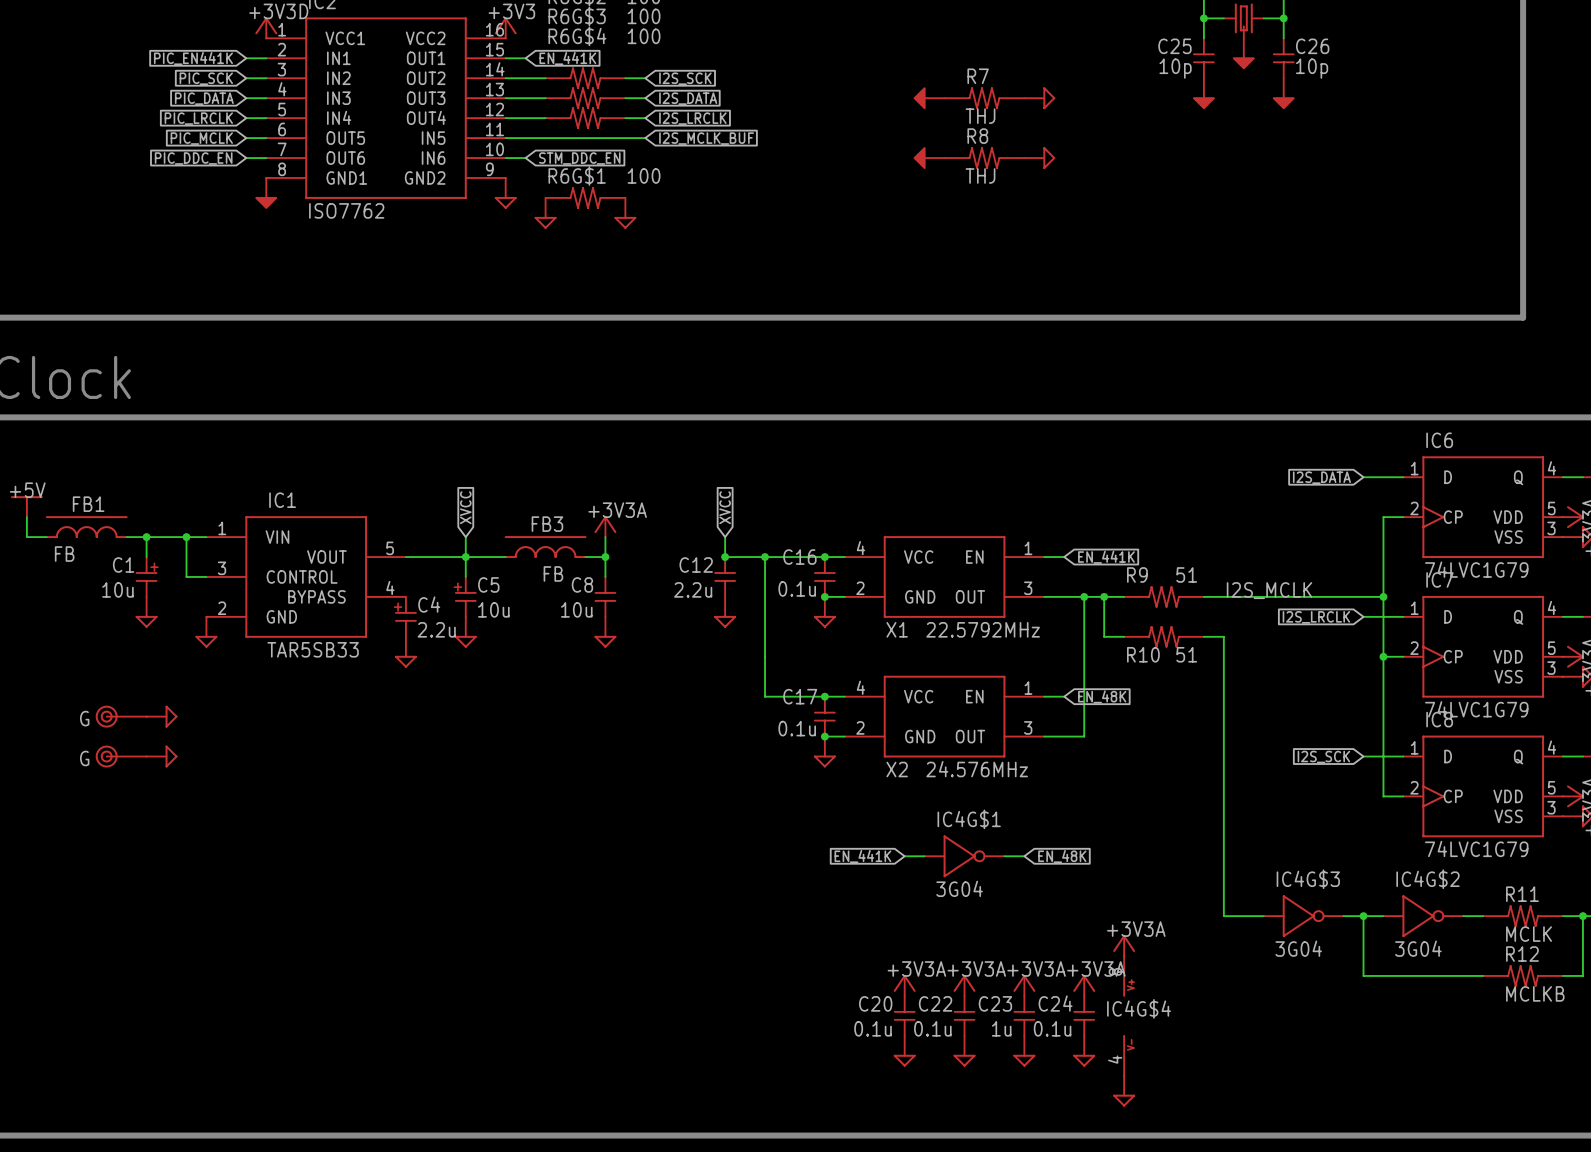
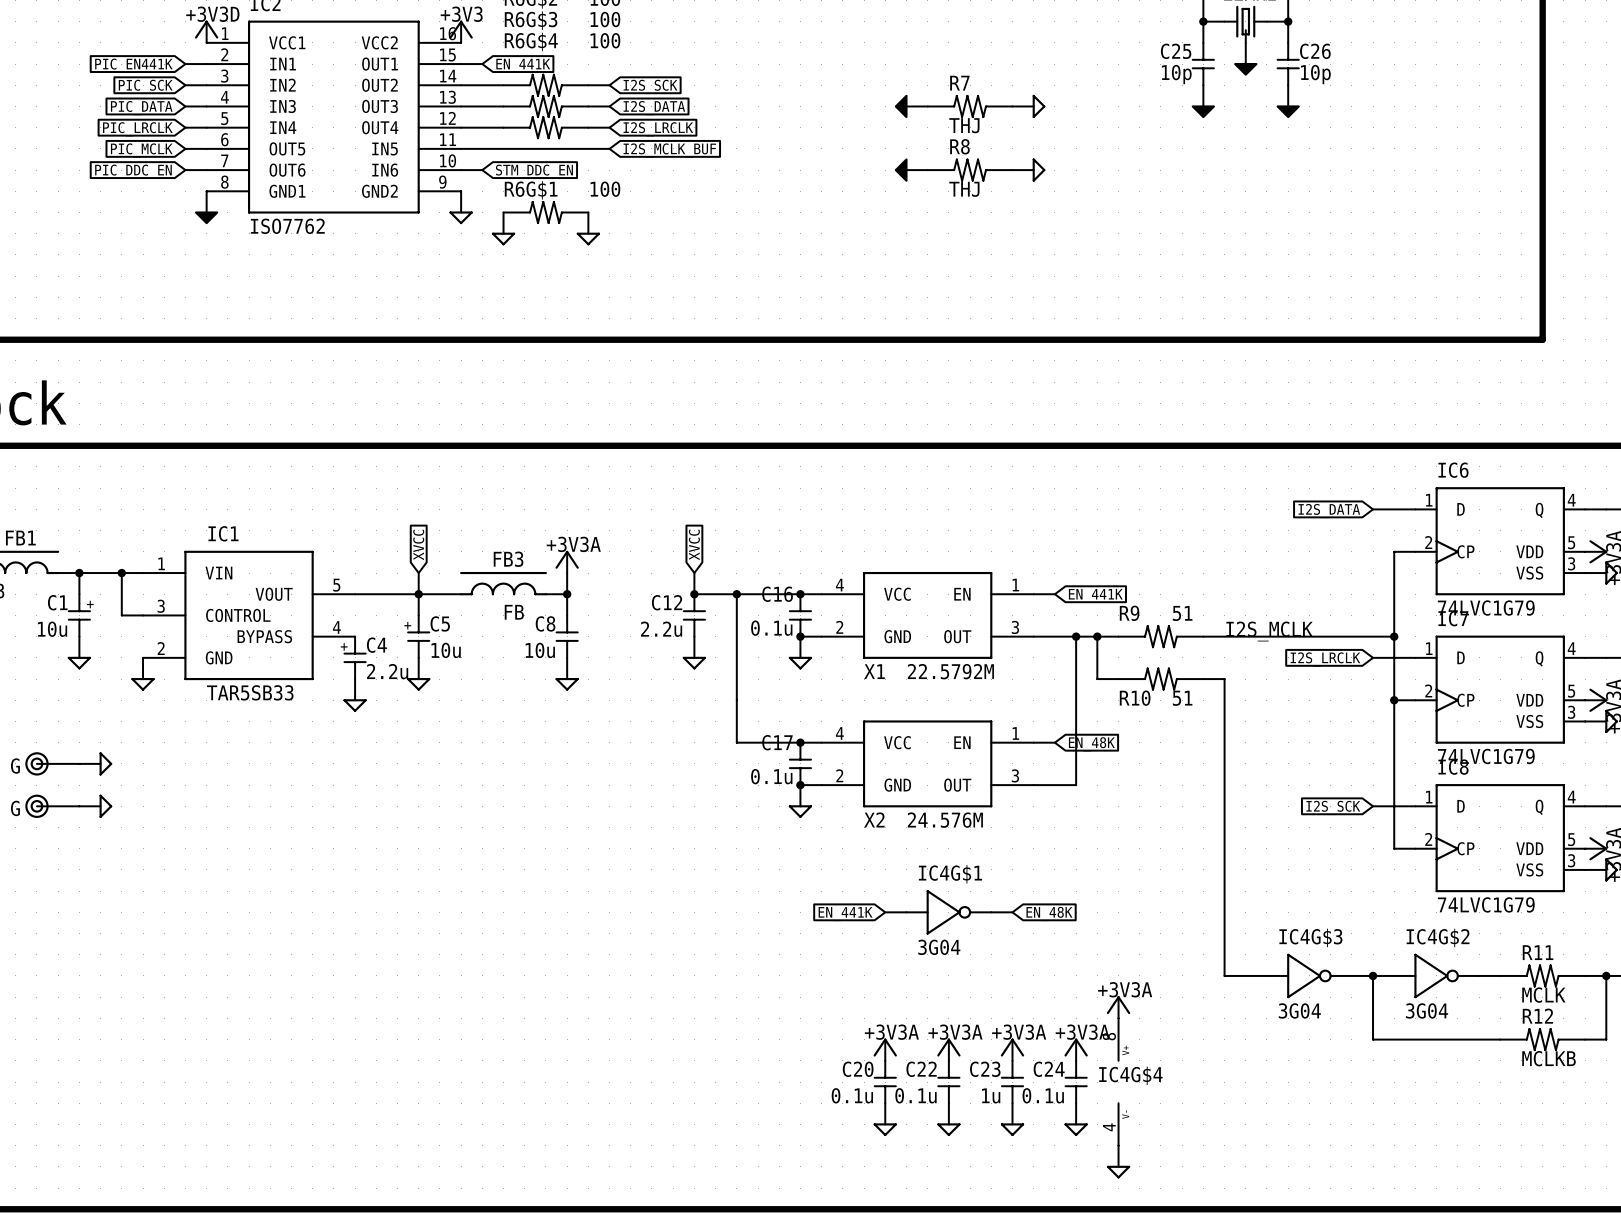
X1 value: 22.5792MHz (983, 629) -> 22.5792M (950, 671)
X2 value: 24.576MHz (977, 769) -> 24.576M (945, 820)

